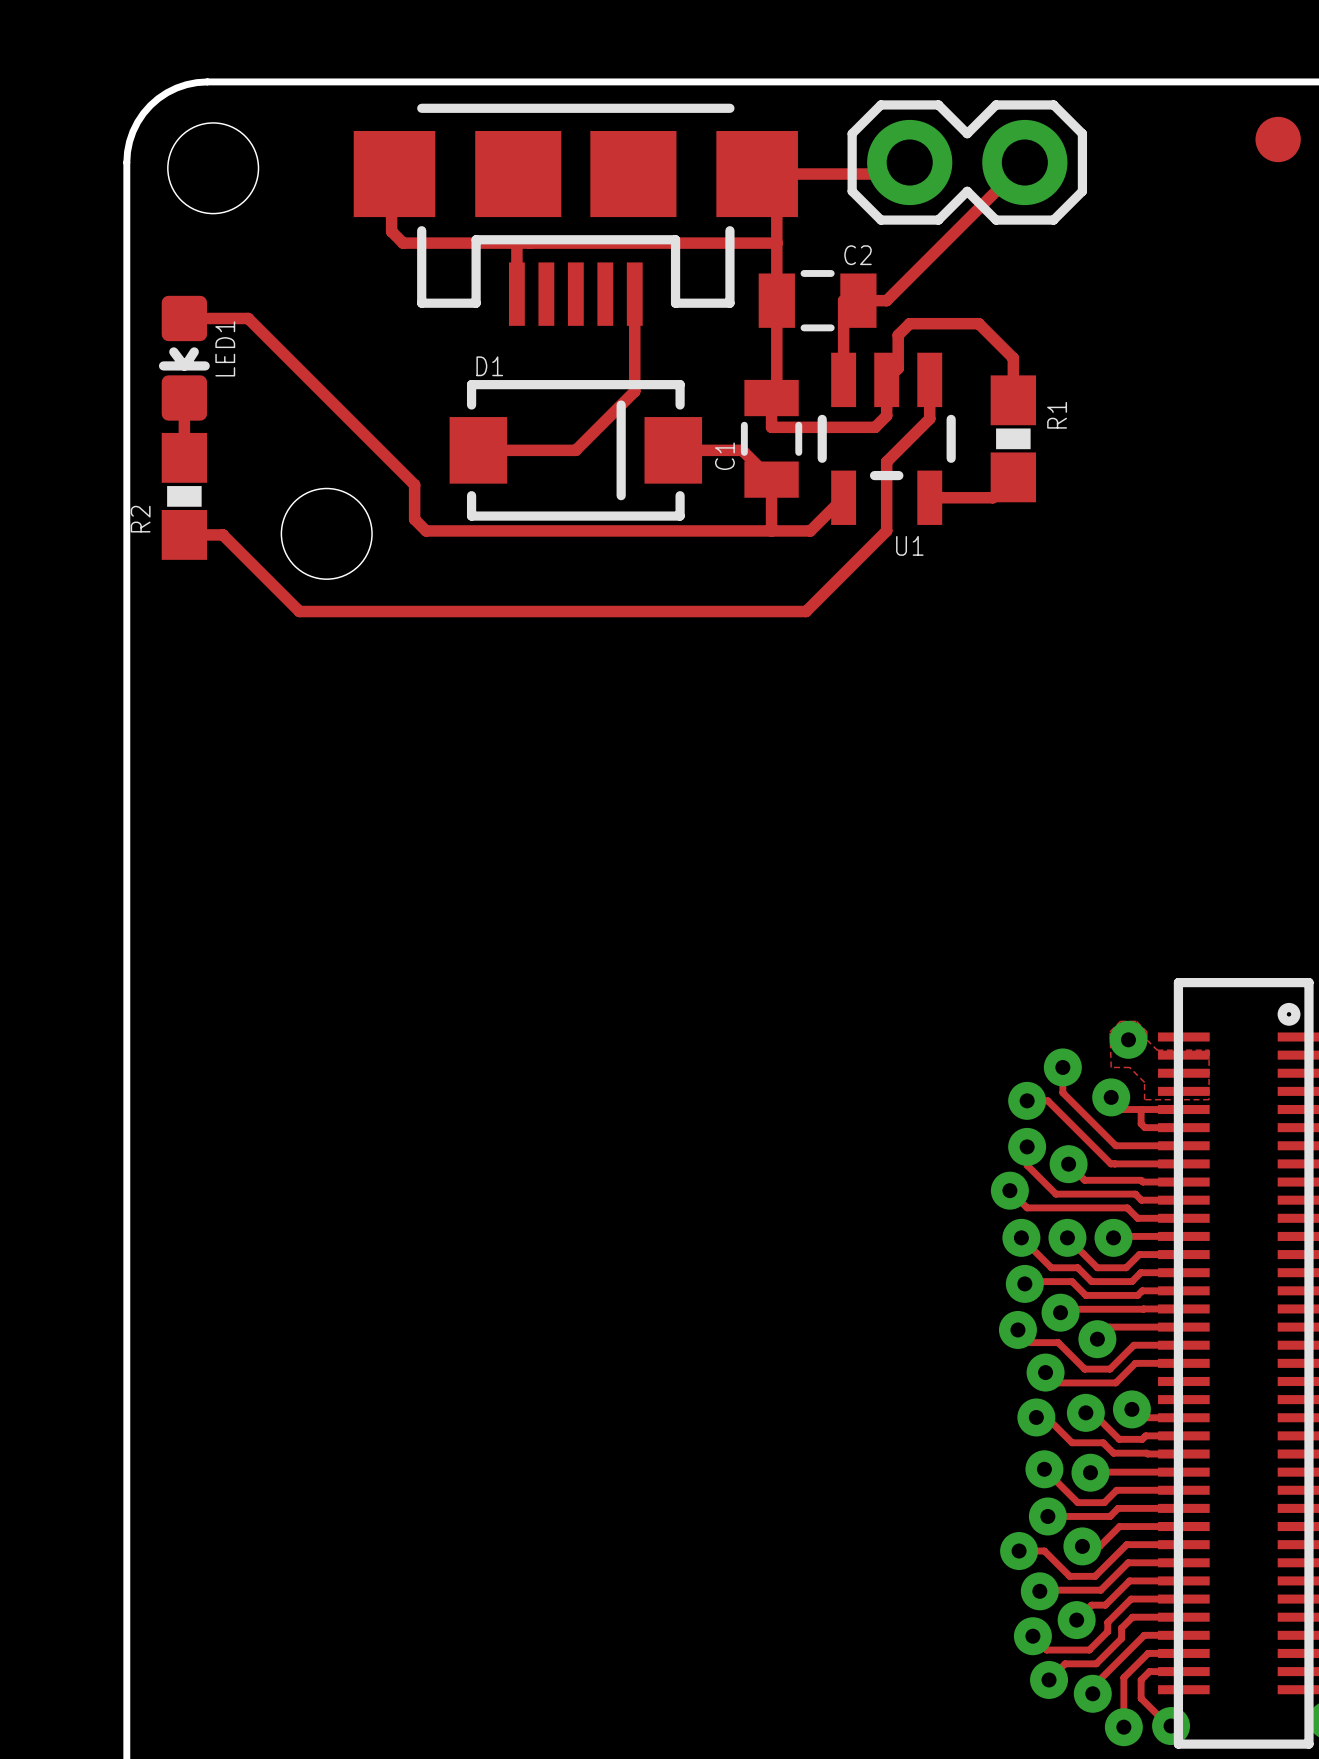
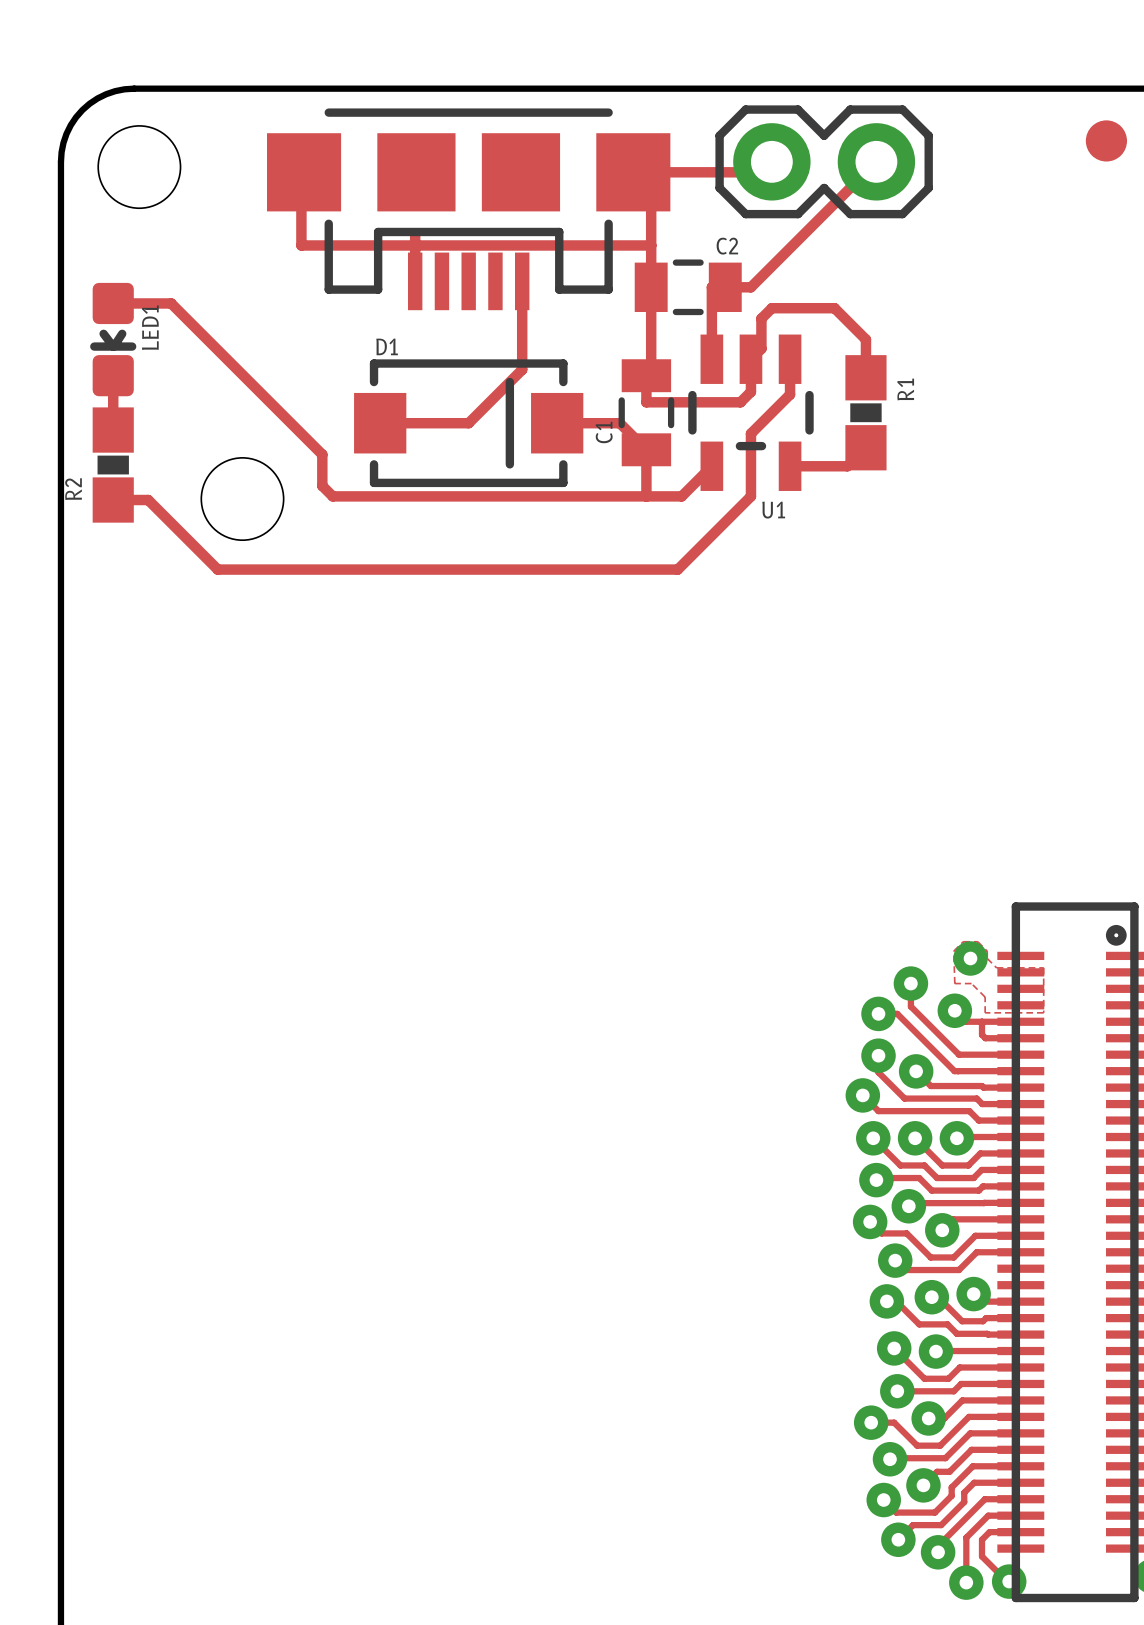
track: (391, 231) (403, 243) (776, 243) -> (301, 224) (301, 245) (651, 245)

